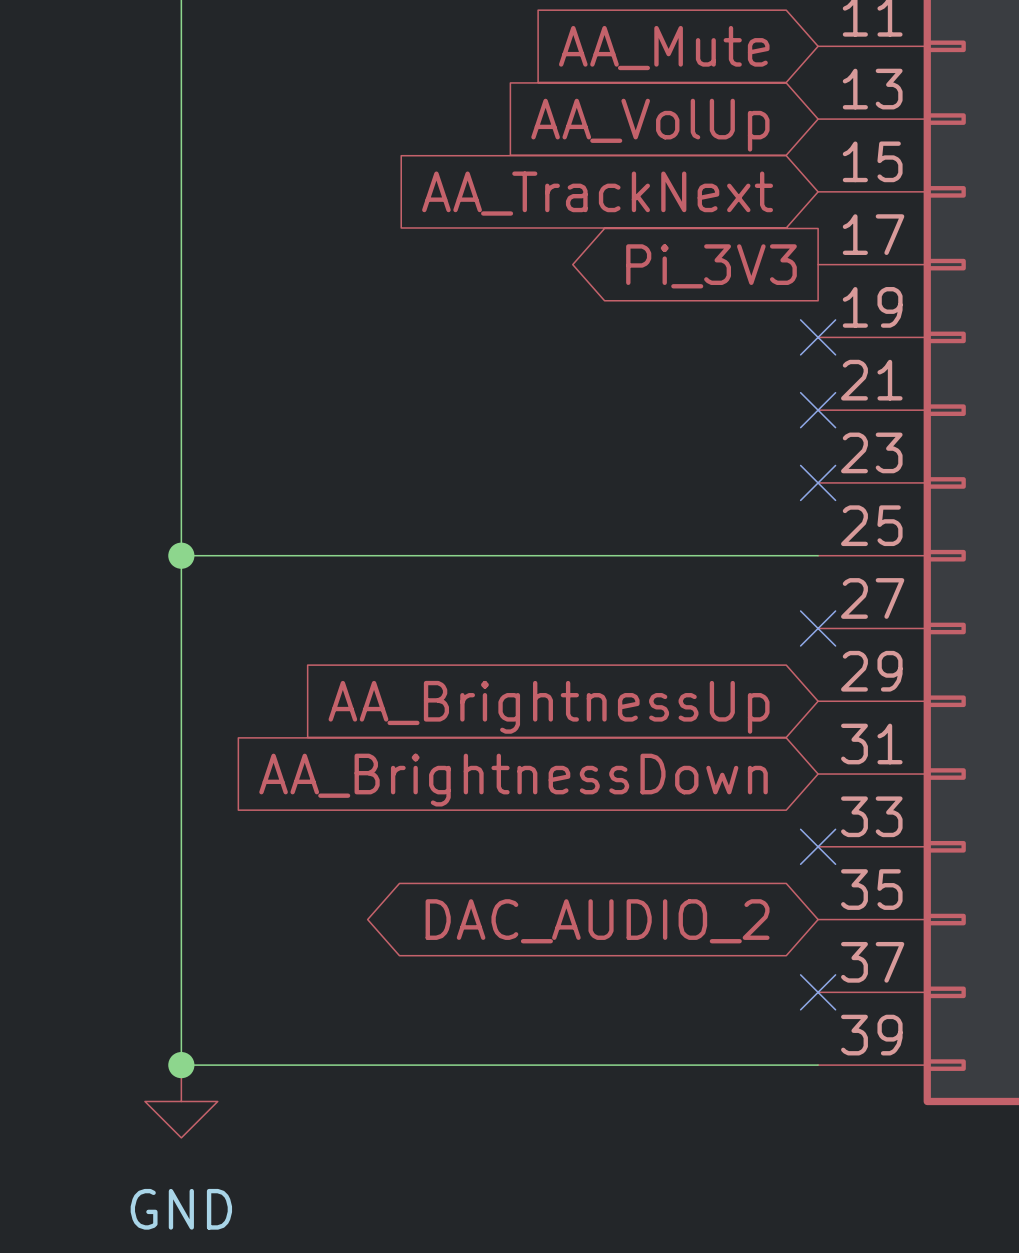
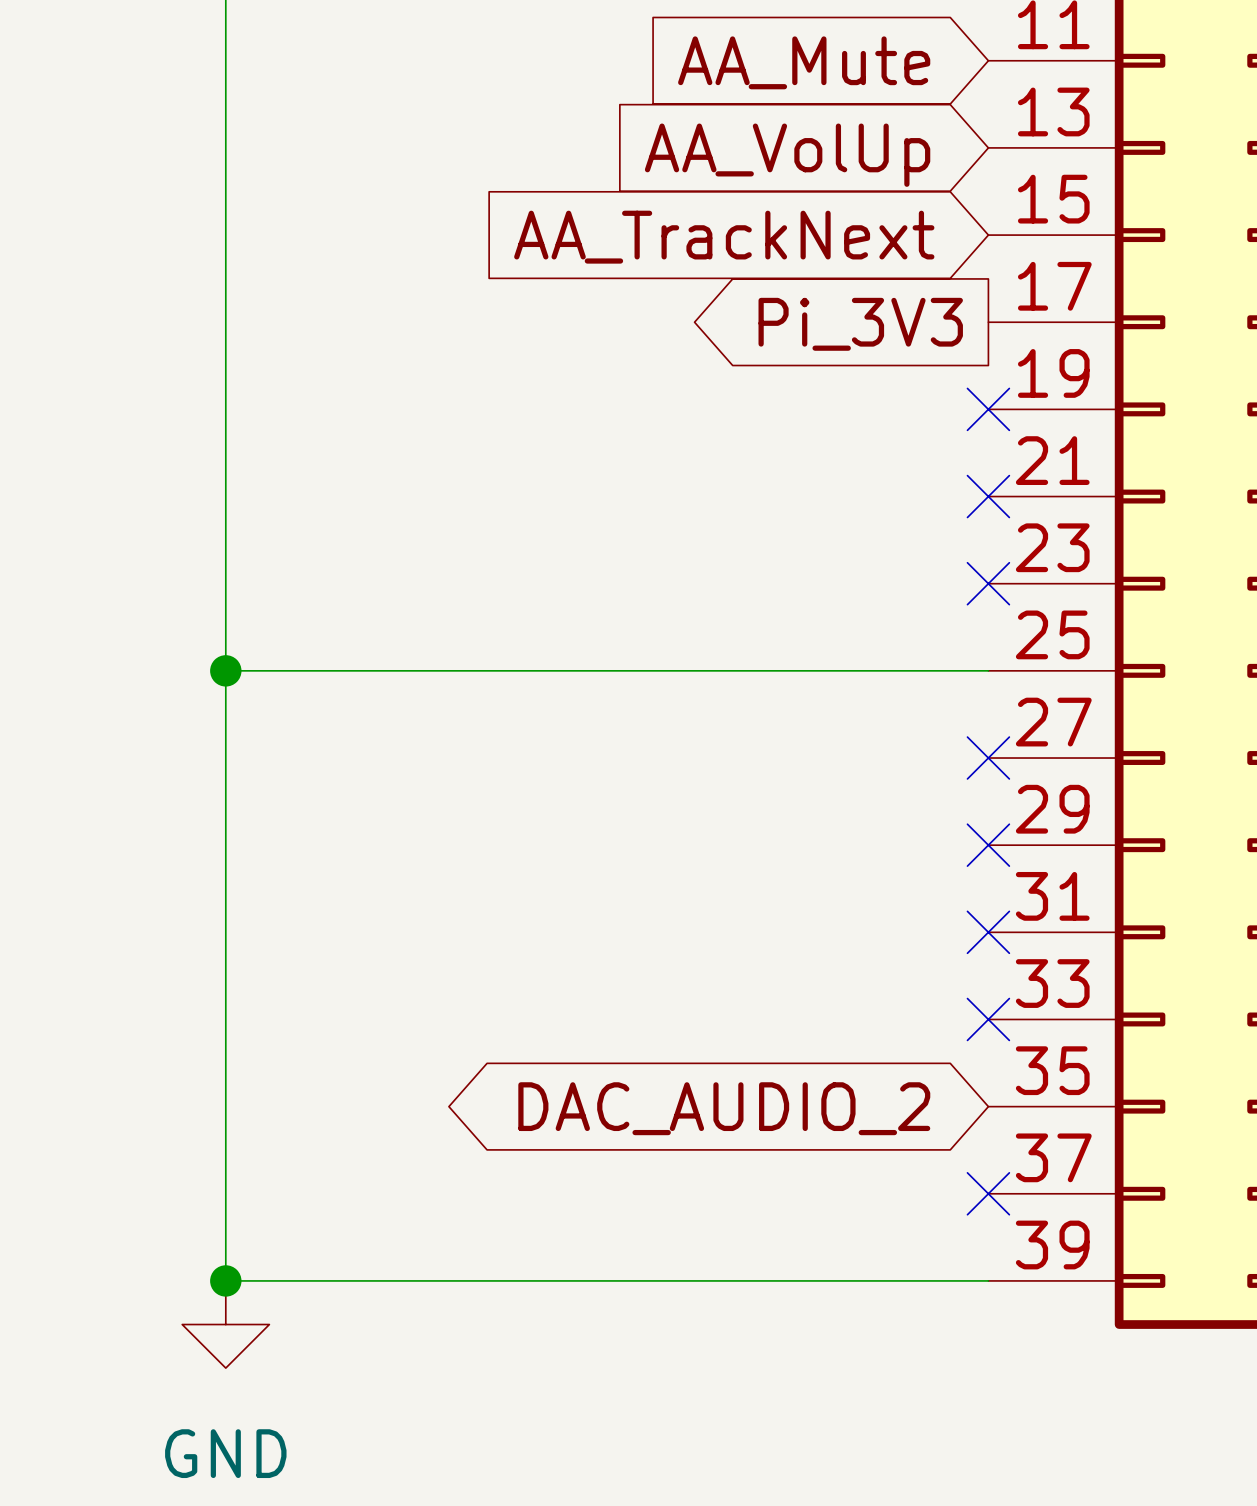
no-connect mark: none -> (988, 845)
global label: AA_BrightnessUp (549, 707) -> none
no-connect mark: none -> (988, 932)
global label: AA_BrightnessDown (513, 780) -> none

